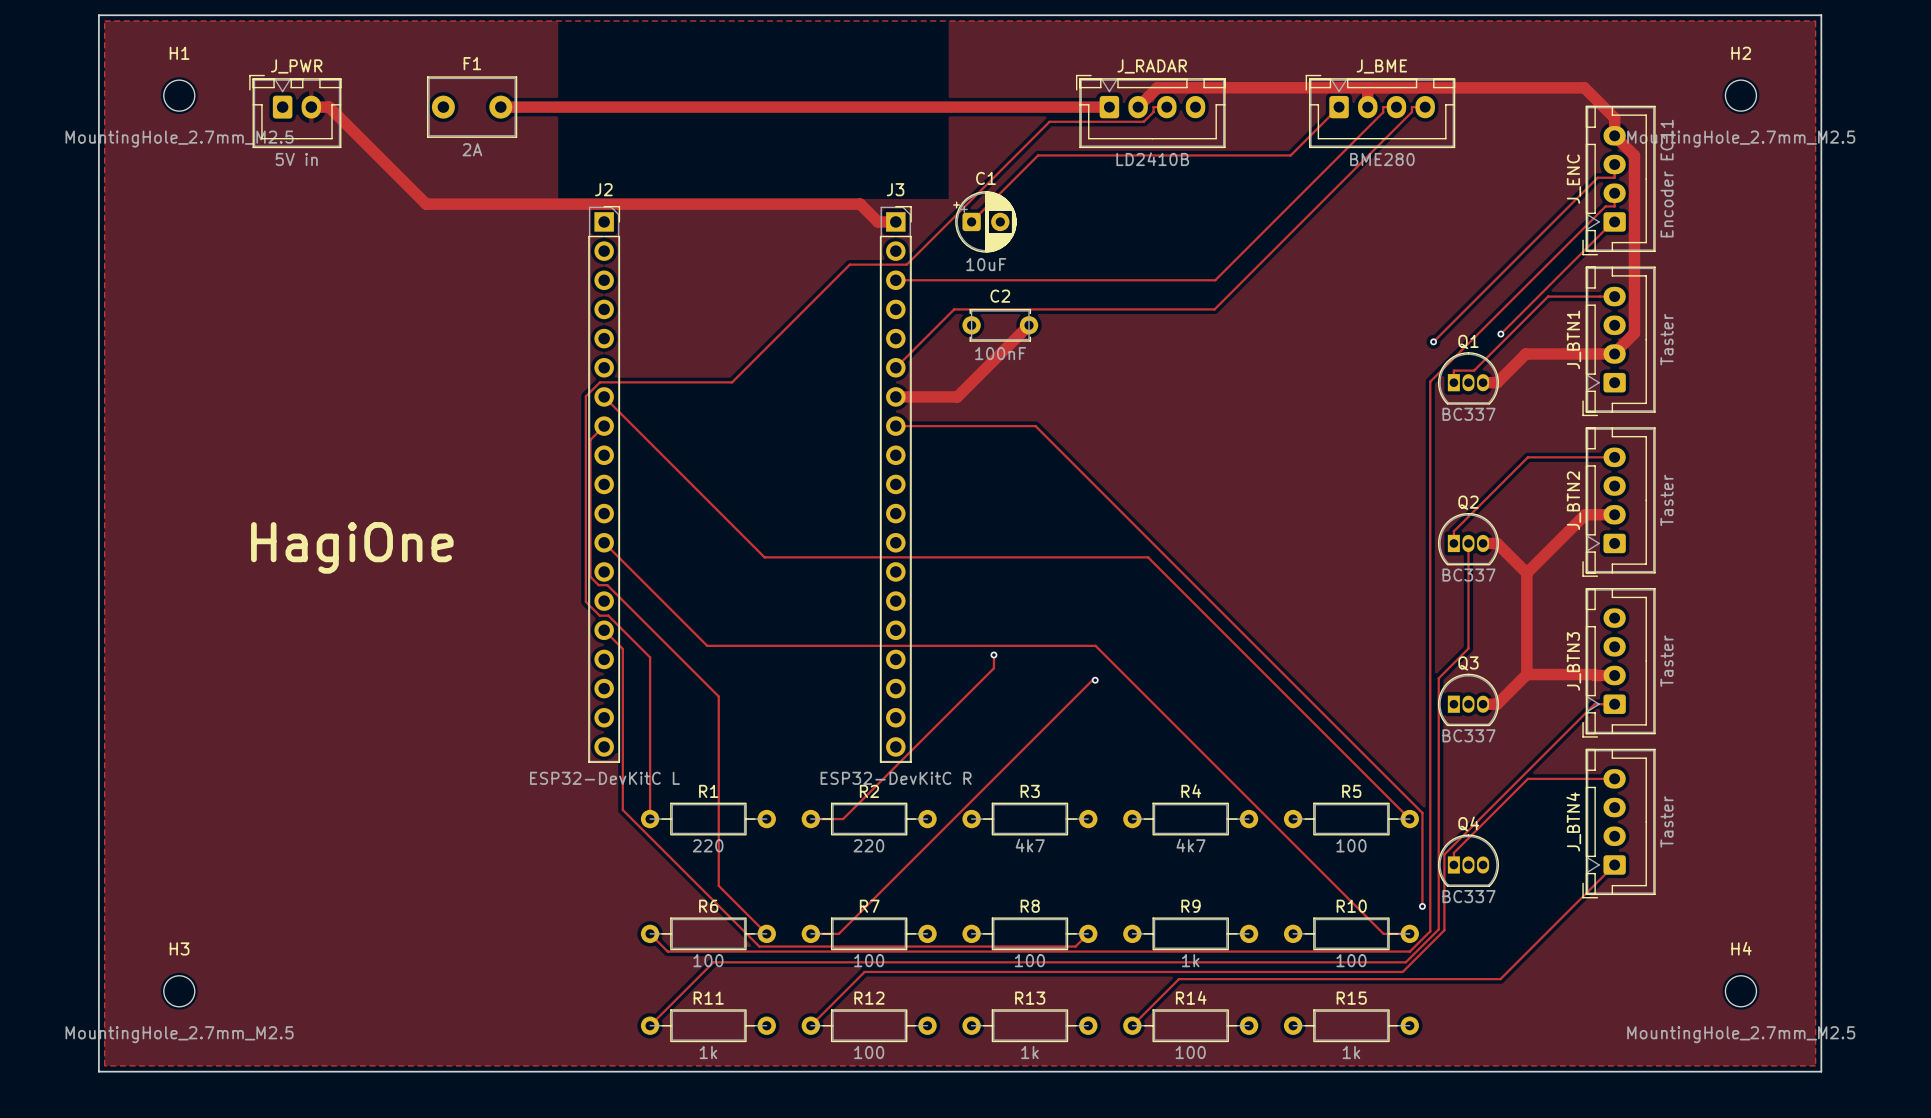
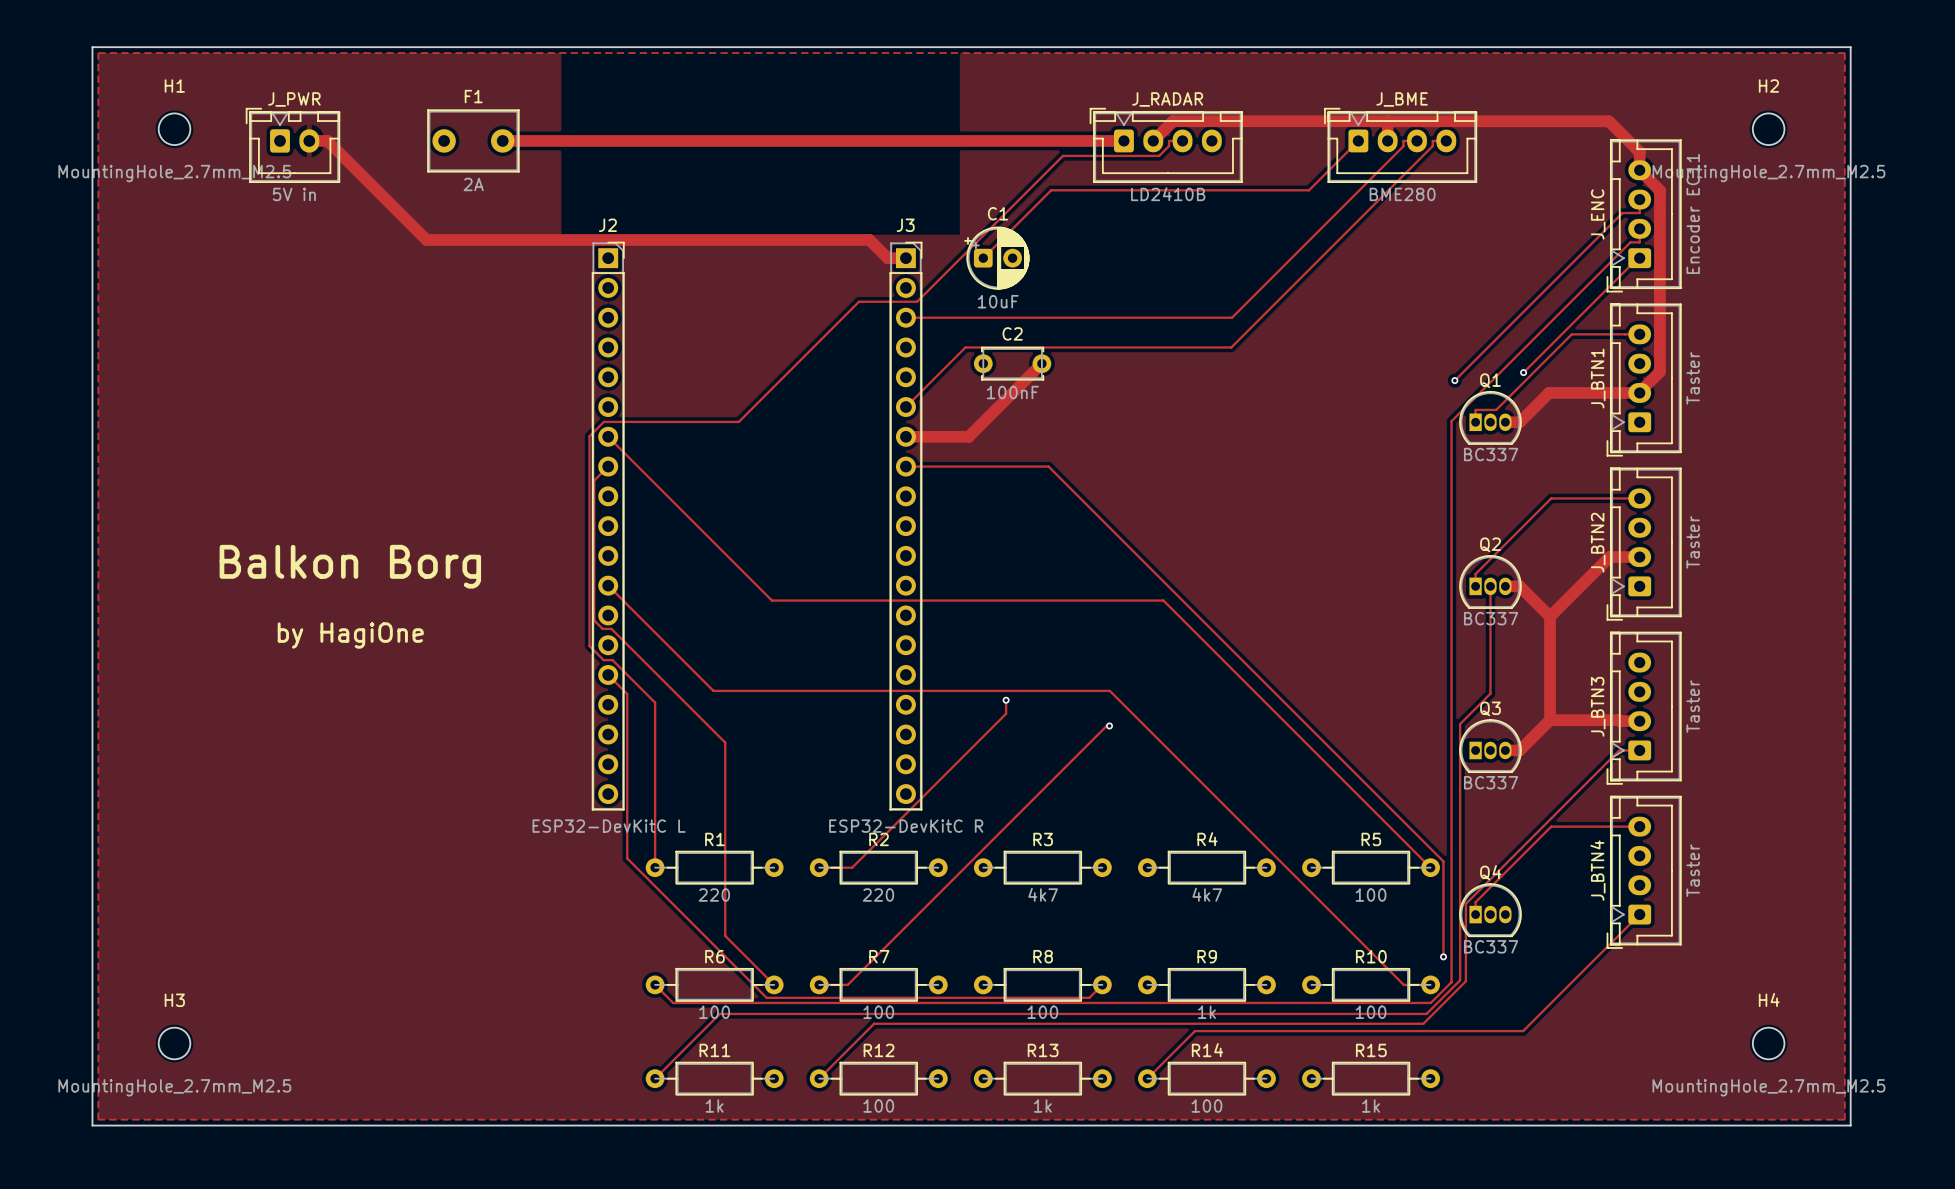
text: none -> Balkon Borg (350, 566)
text: HagiOne (352, 547) -> by HagiOne (350, 635)

